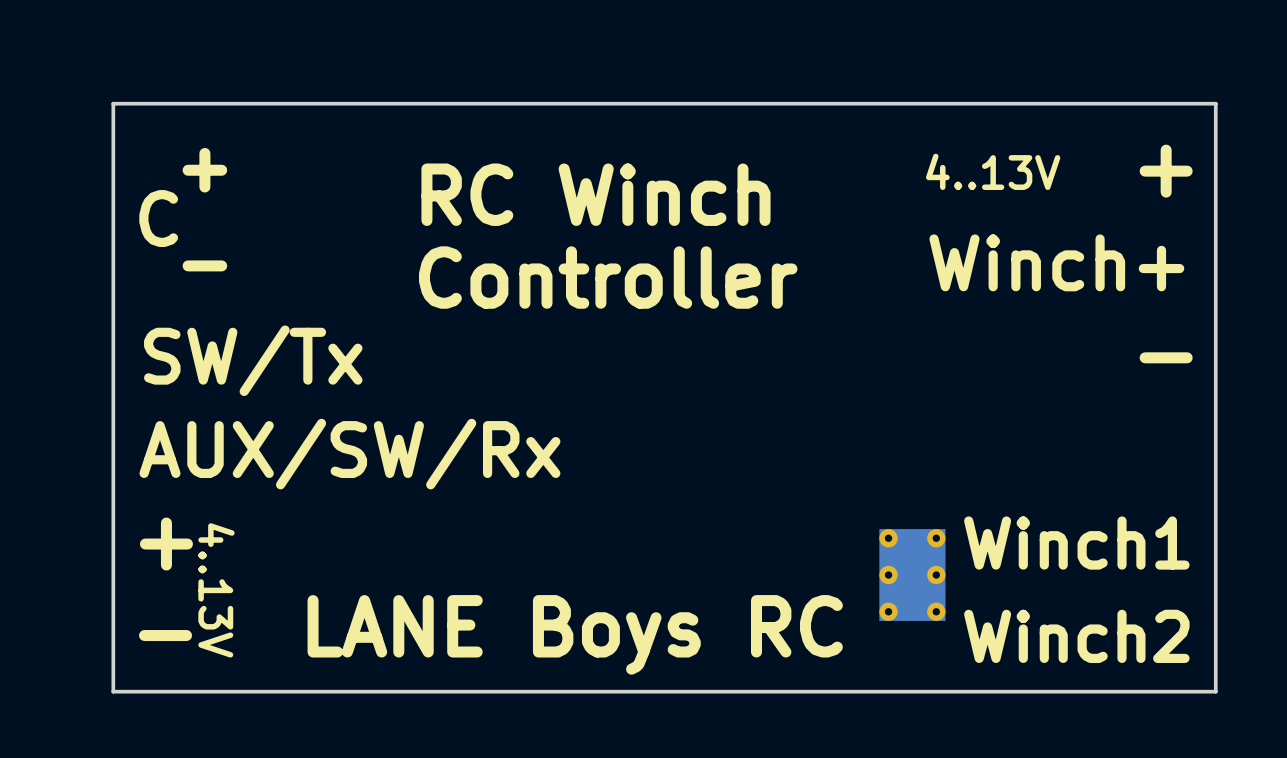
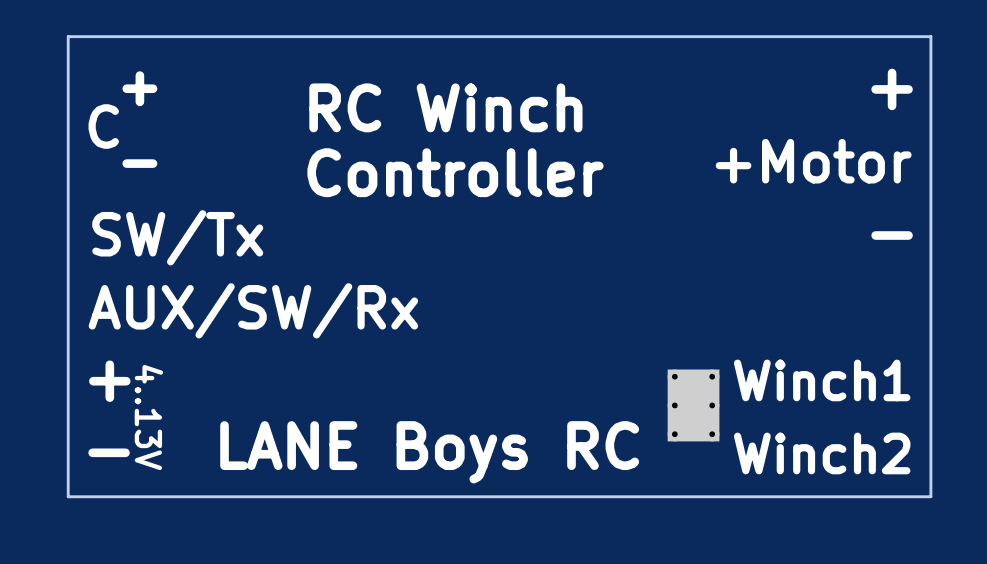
text: 4..13V (993, 171) -> none
text: Winch+ (1056, 262) -> +Motor (813, 161)

